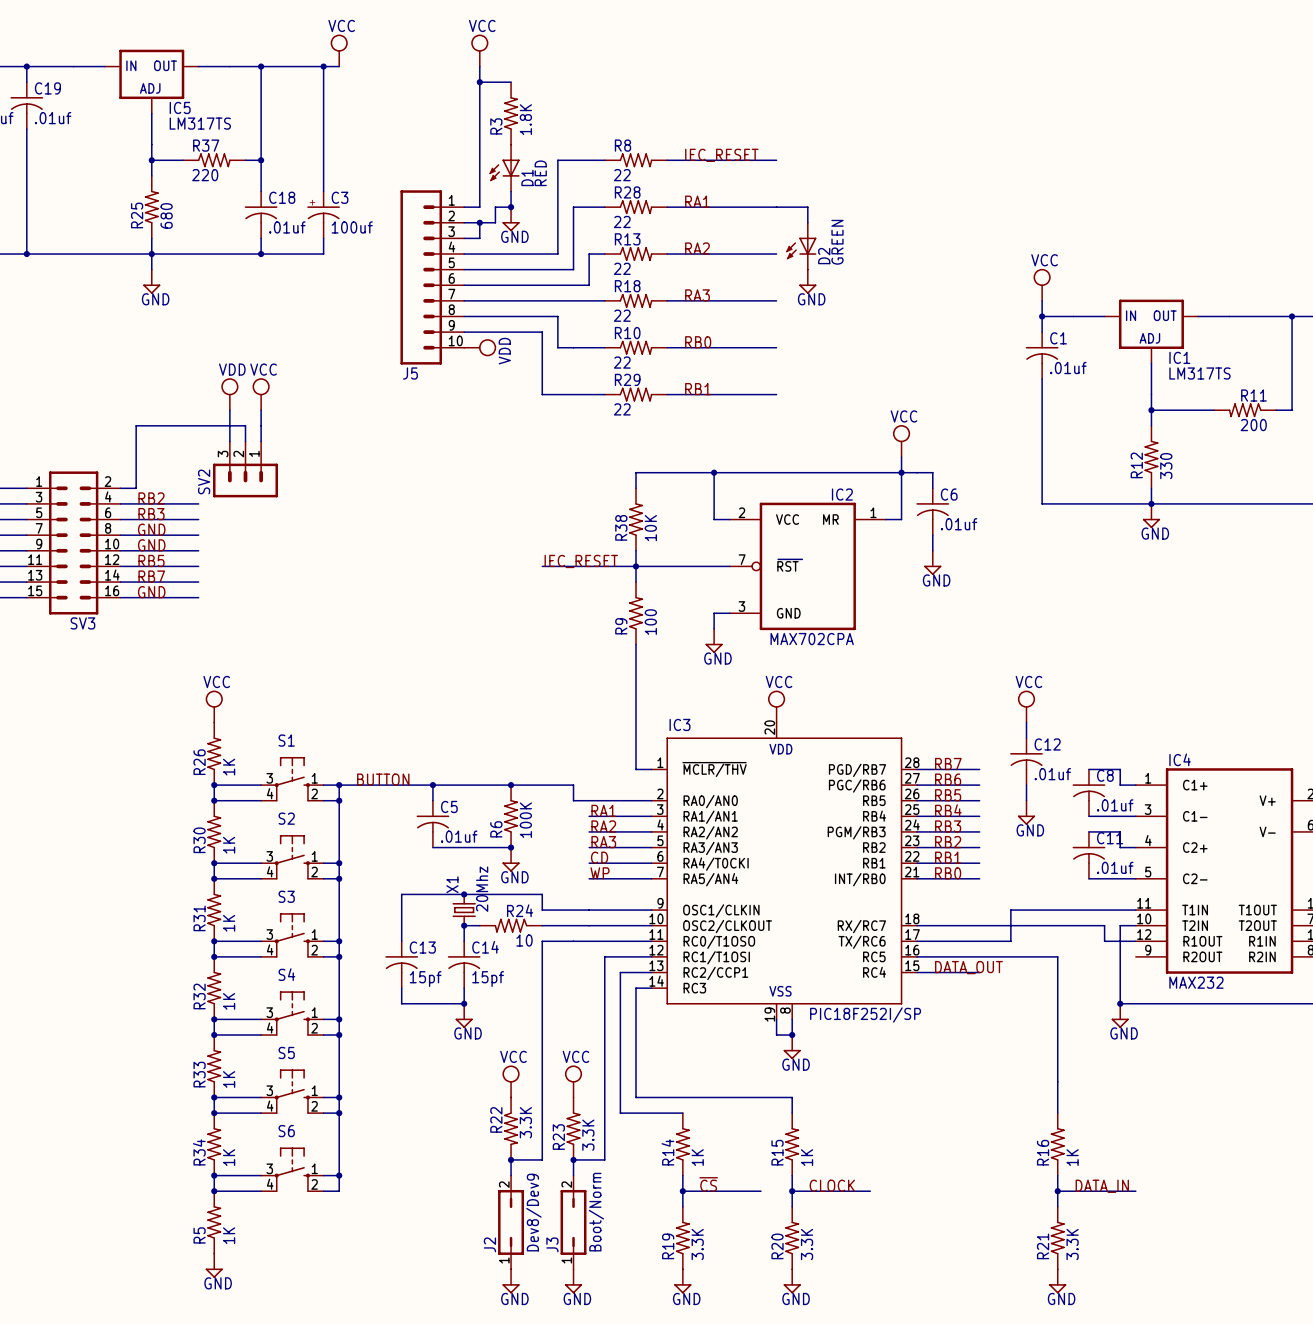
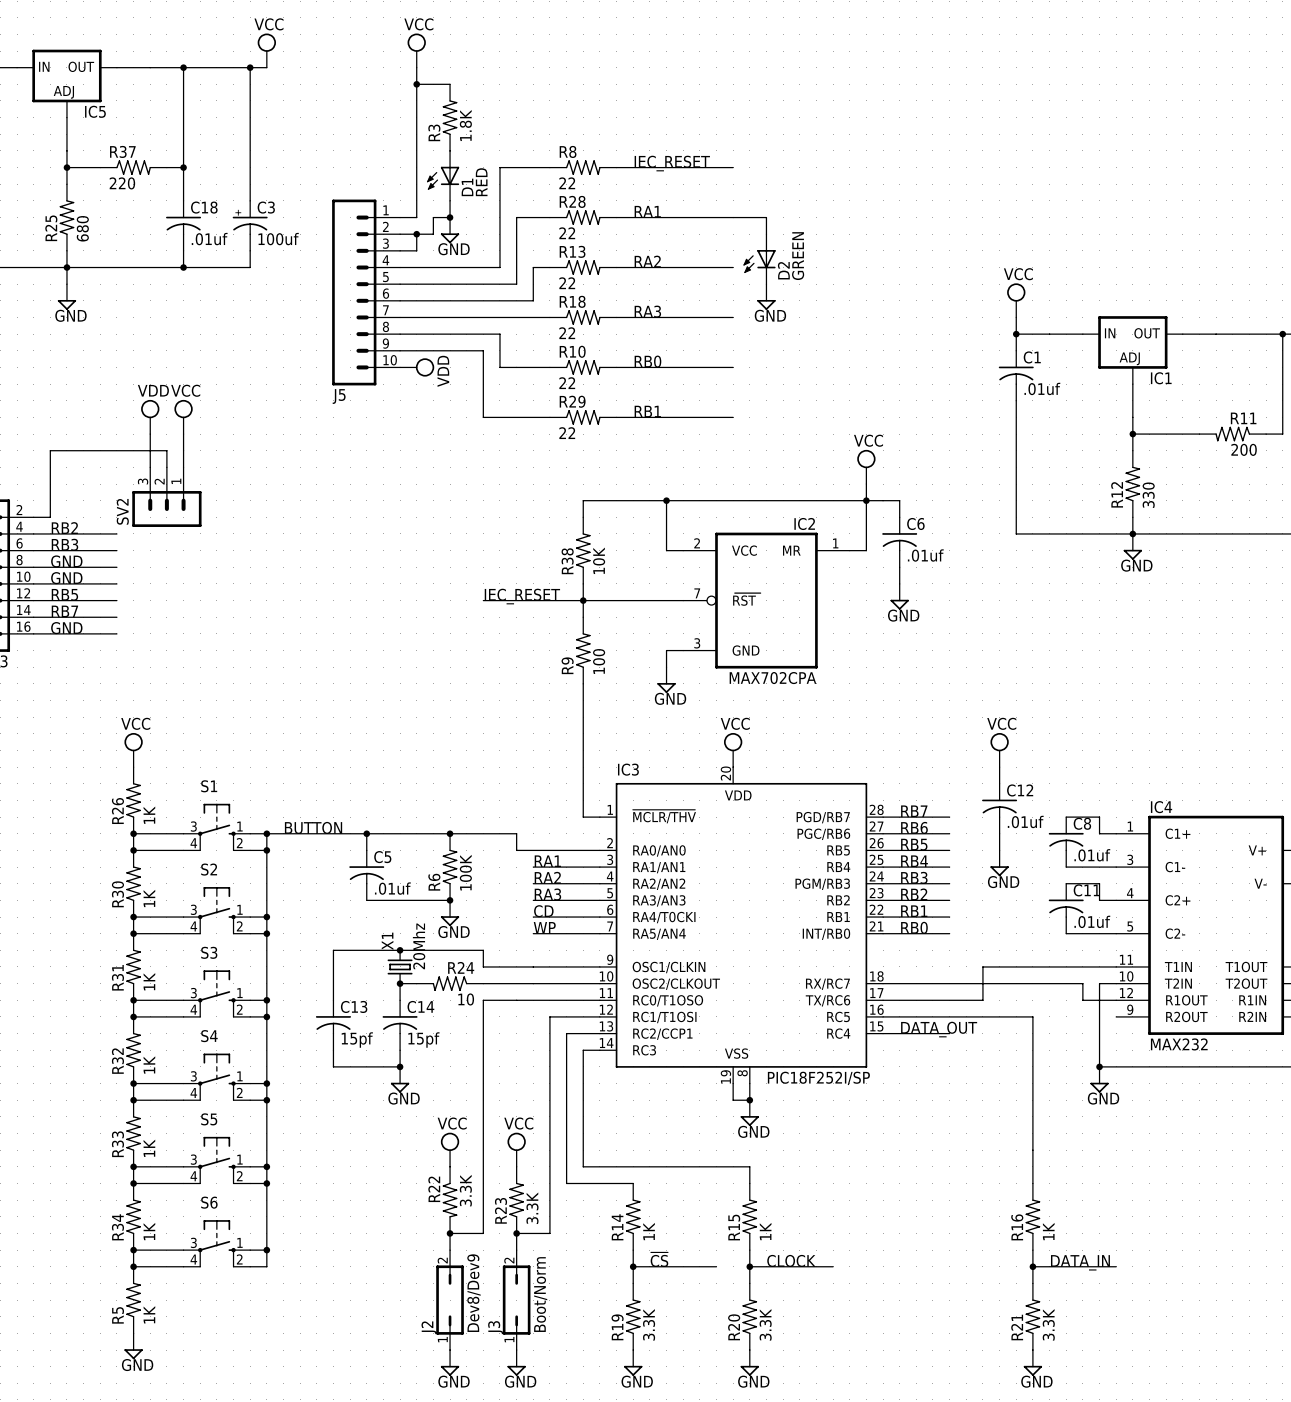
IC5 value: LM317TS (200, 123) -> none
IC1 value: LM317TS (1199, 373) -> none

